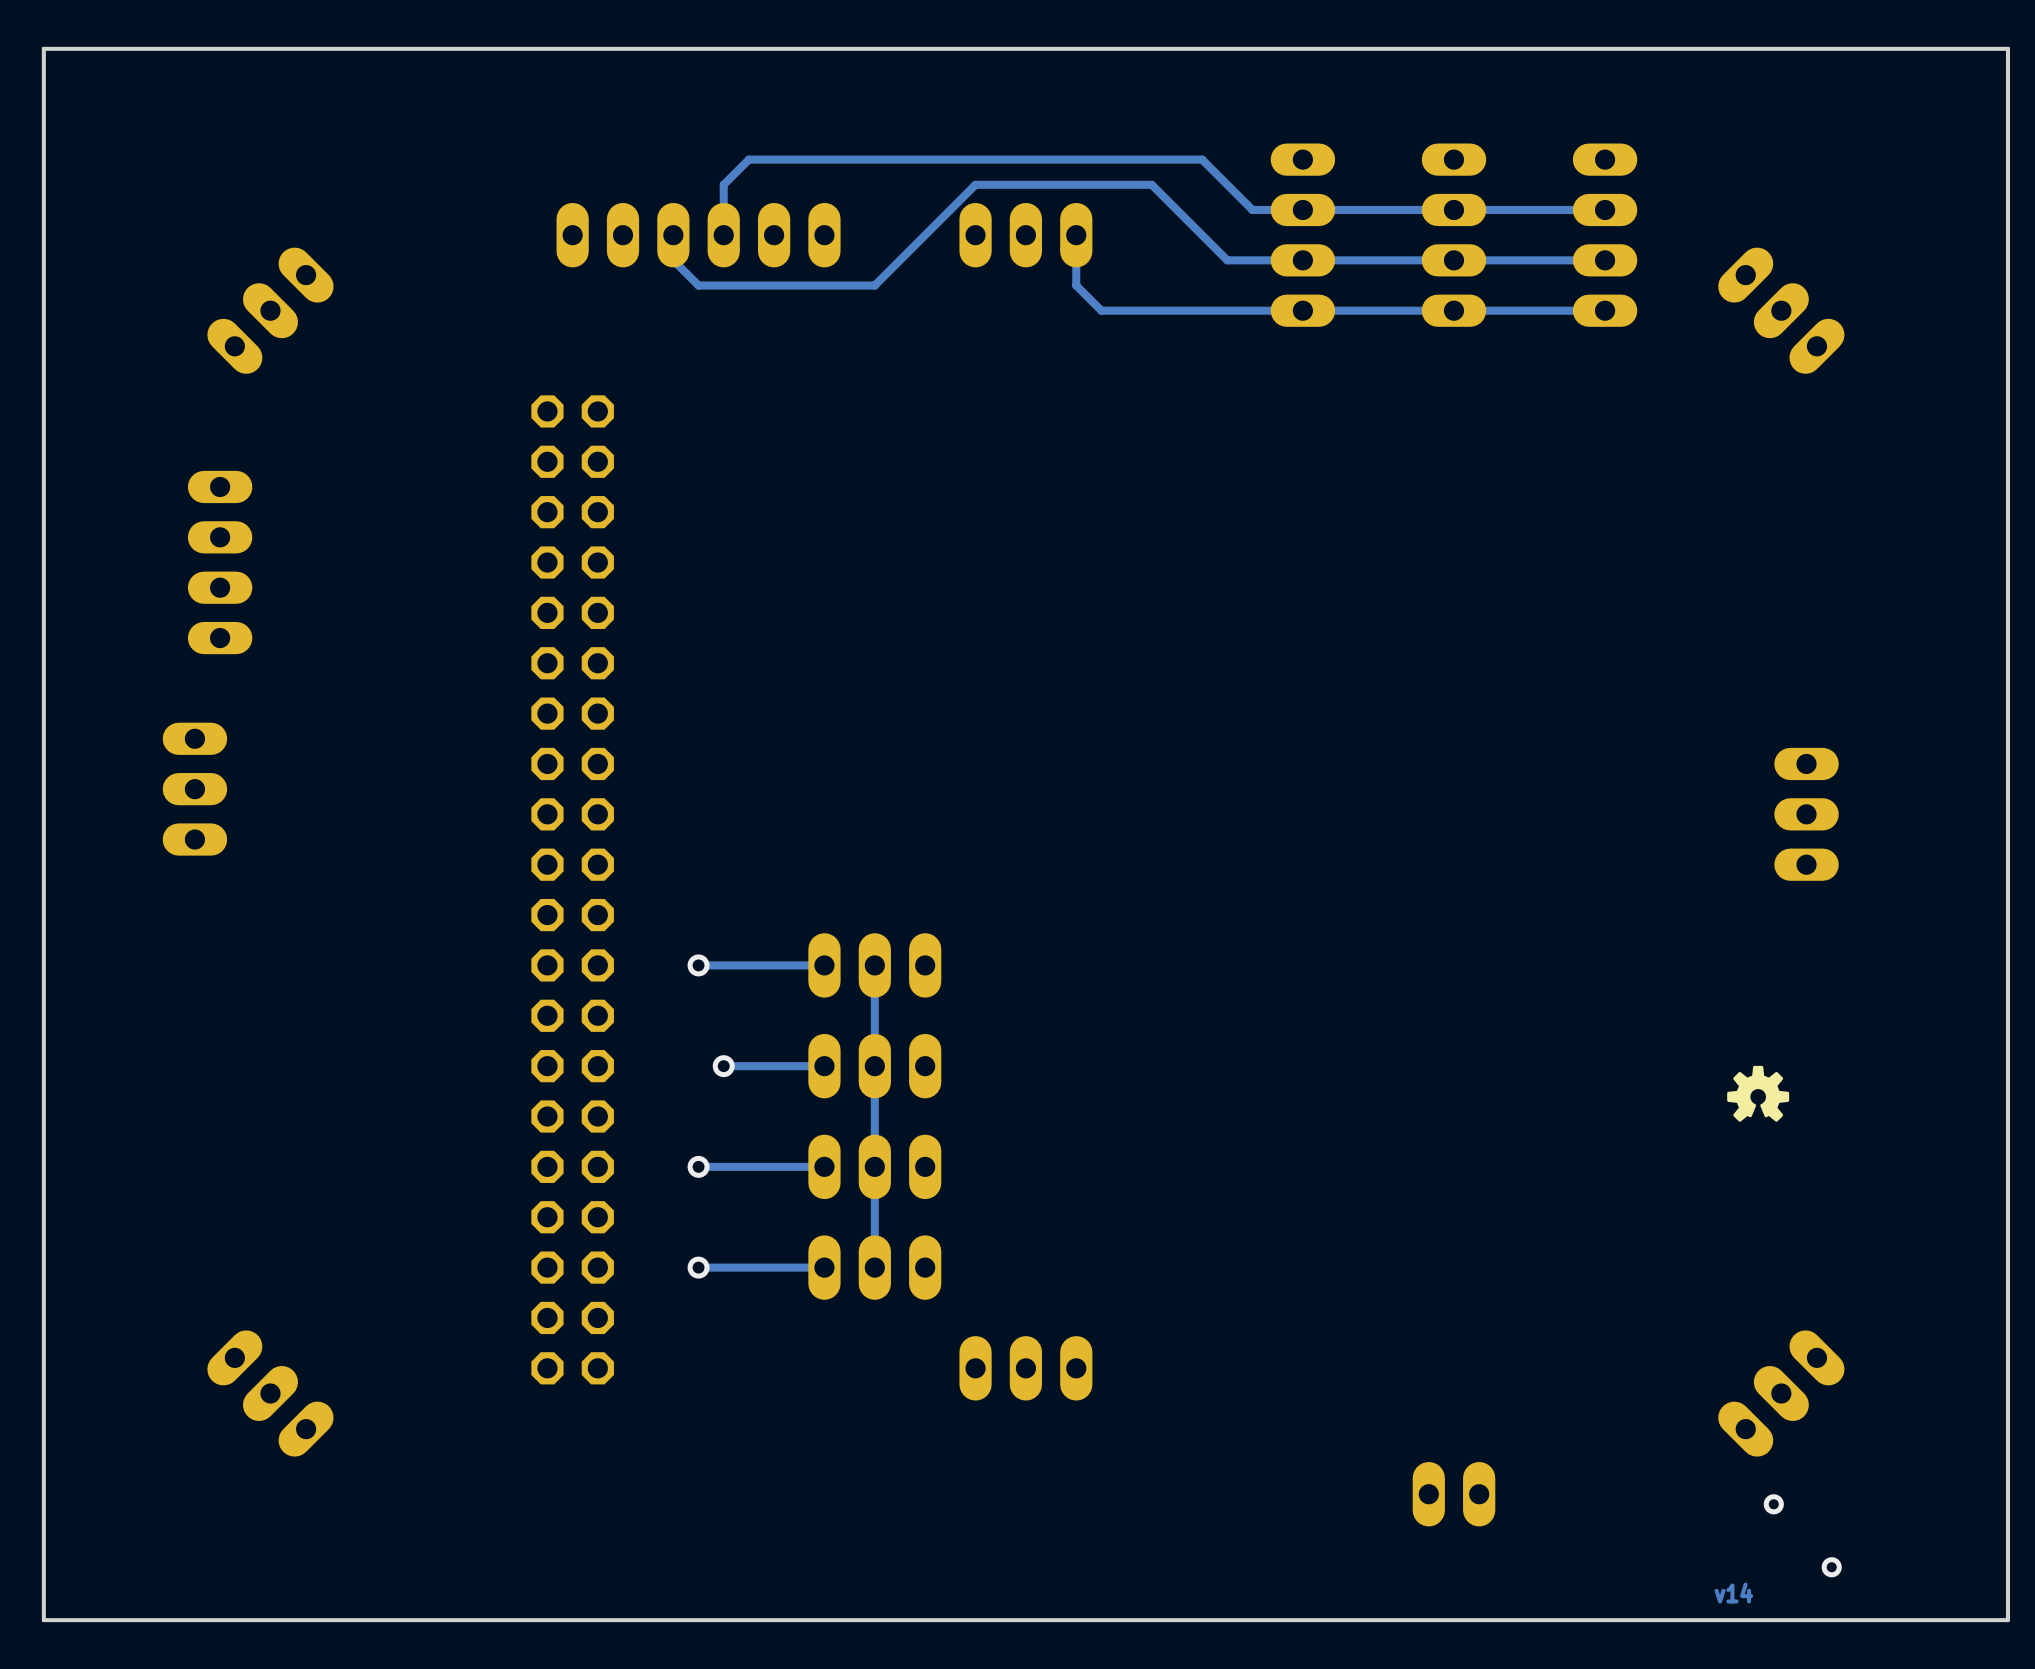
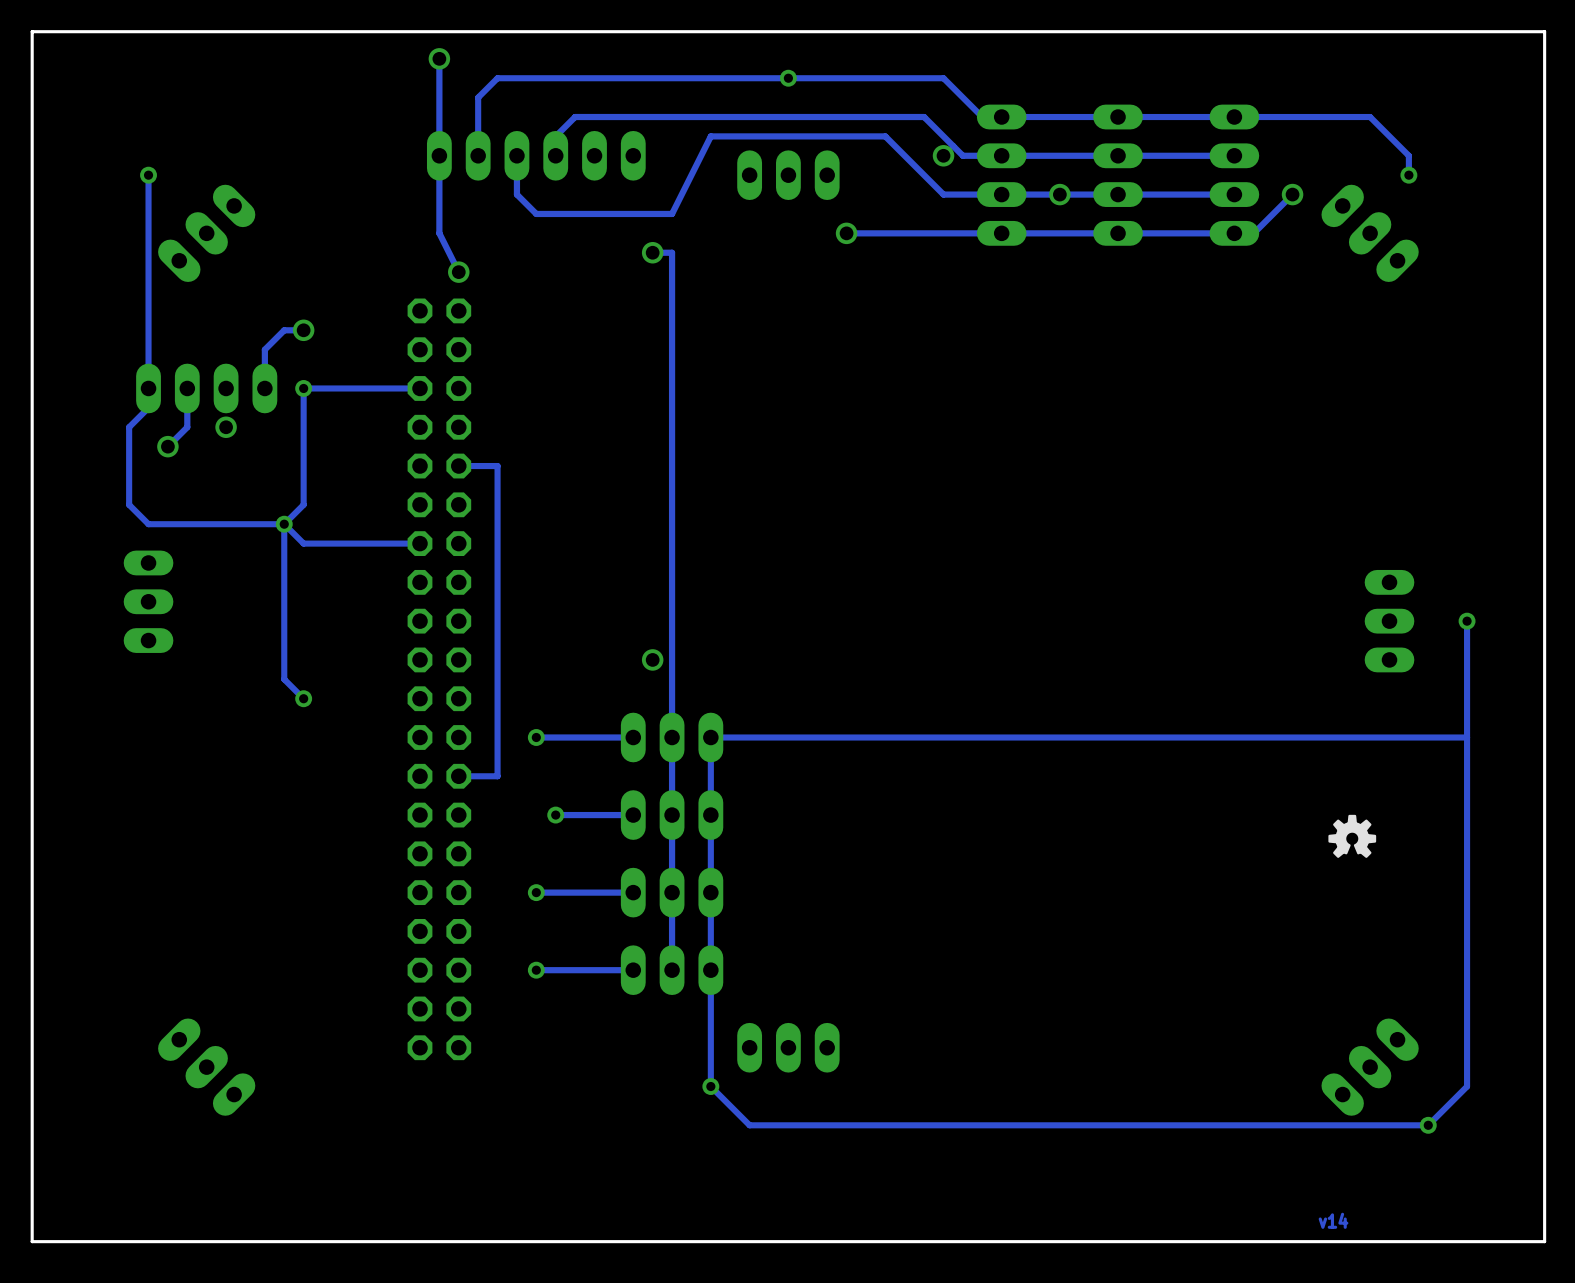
track: none -> (439, 58) (439, 233) (458, 272)
via: none -> (439, 58)
via: none -> (788, 78)
track: (975, 184) (874, 285) -> (749, 136) (710, 136) (672, 213)
track: none -> (478, 155) (478, 97) (497, 78) (943, 78) (982, 117) (1370, 117) (1408, 155) (1408, 175)
via: none -> (943, 155)
track: none -> (148, 175) (148, 407) (129, 427) (129, 504) (148, 524) (284, 524)
via: none -> (148, 175)
part position: (698, 235) -> (536, 155)
track: (1076, 235) (1076, 285) (1101, 310) -> none
via: none -> (1408, 175)
via: none -> (1059, 194)
track: none -> (1292, 194) (1253, 233) (1234, 233)
via: none -> (1292, 194)
via: none -> (846, 233)
track: none -> (652, 252) (672, 252) (672, 737)
via: none -> (652, 252)
via: none -> (458, 272)
track: none -> (303, 330) (284, 330) (264, 349) (264, 388)
via: none -> (303, 330)
track: none -> (187, 388) (187, 427) (167, 446)
via: none -> (303, 388)
track: none -> (419, 388) (303, 388) (303, 504) (284, 524)
part rotation: 0° (220, 562) -> 90° clockwise (206, 388)
via: none -> (226, 427)
via: none -> (167, 446)
track: none -> (458, 466) (497, 466) (497, 776) (458, 776)
track: none -> (284, 524) (284, 679) (303, 698)
track: none -> (284, 524) (303, 543) (419, 543)
via: none -> (284, 524)
track: none -> (1467, 621) (1467, 1086) (1428, 1125) (749, 1125) (710, 1086) (710, 737) (1467, 737)
via: none -> (1467, 621)
via: none -> (652, 659)
via: none -> (303, 698)
via: none -> (710, 1086)
via: none -> (1428, 1125)
part: (1453, 1494) -> none
via: (1773, 1504) -> none
via: (1831, 1567) -> none

